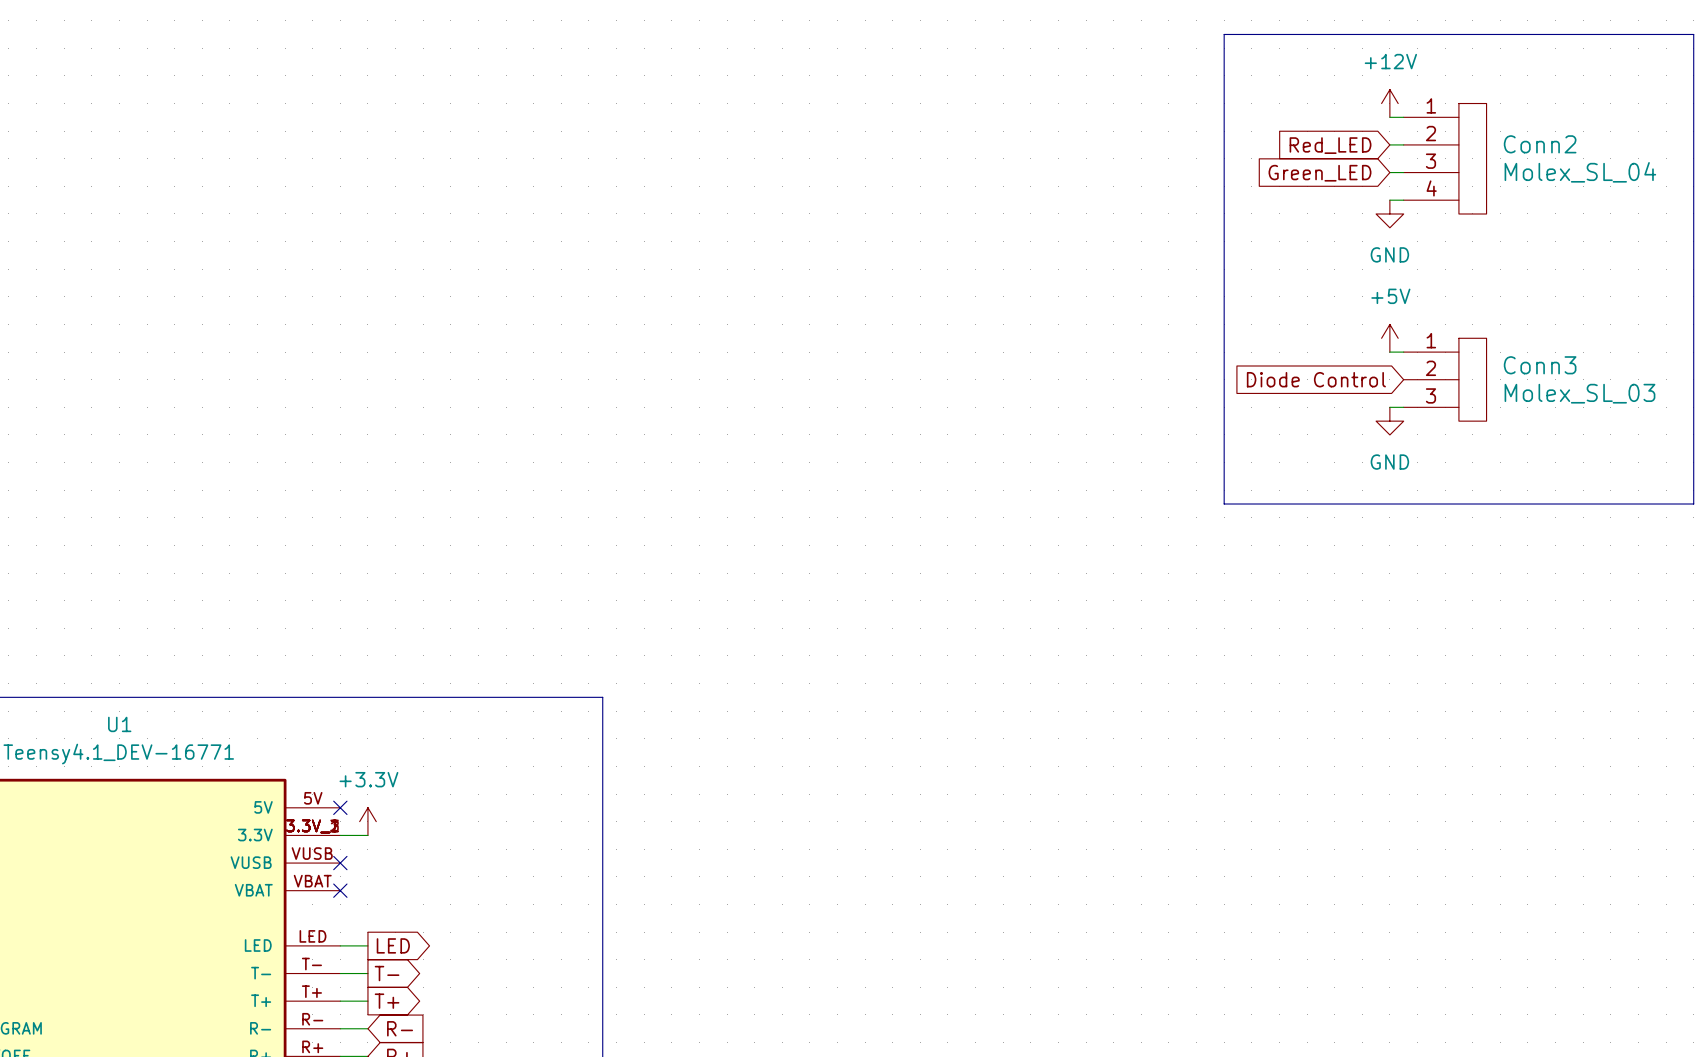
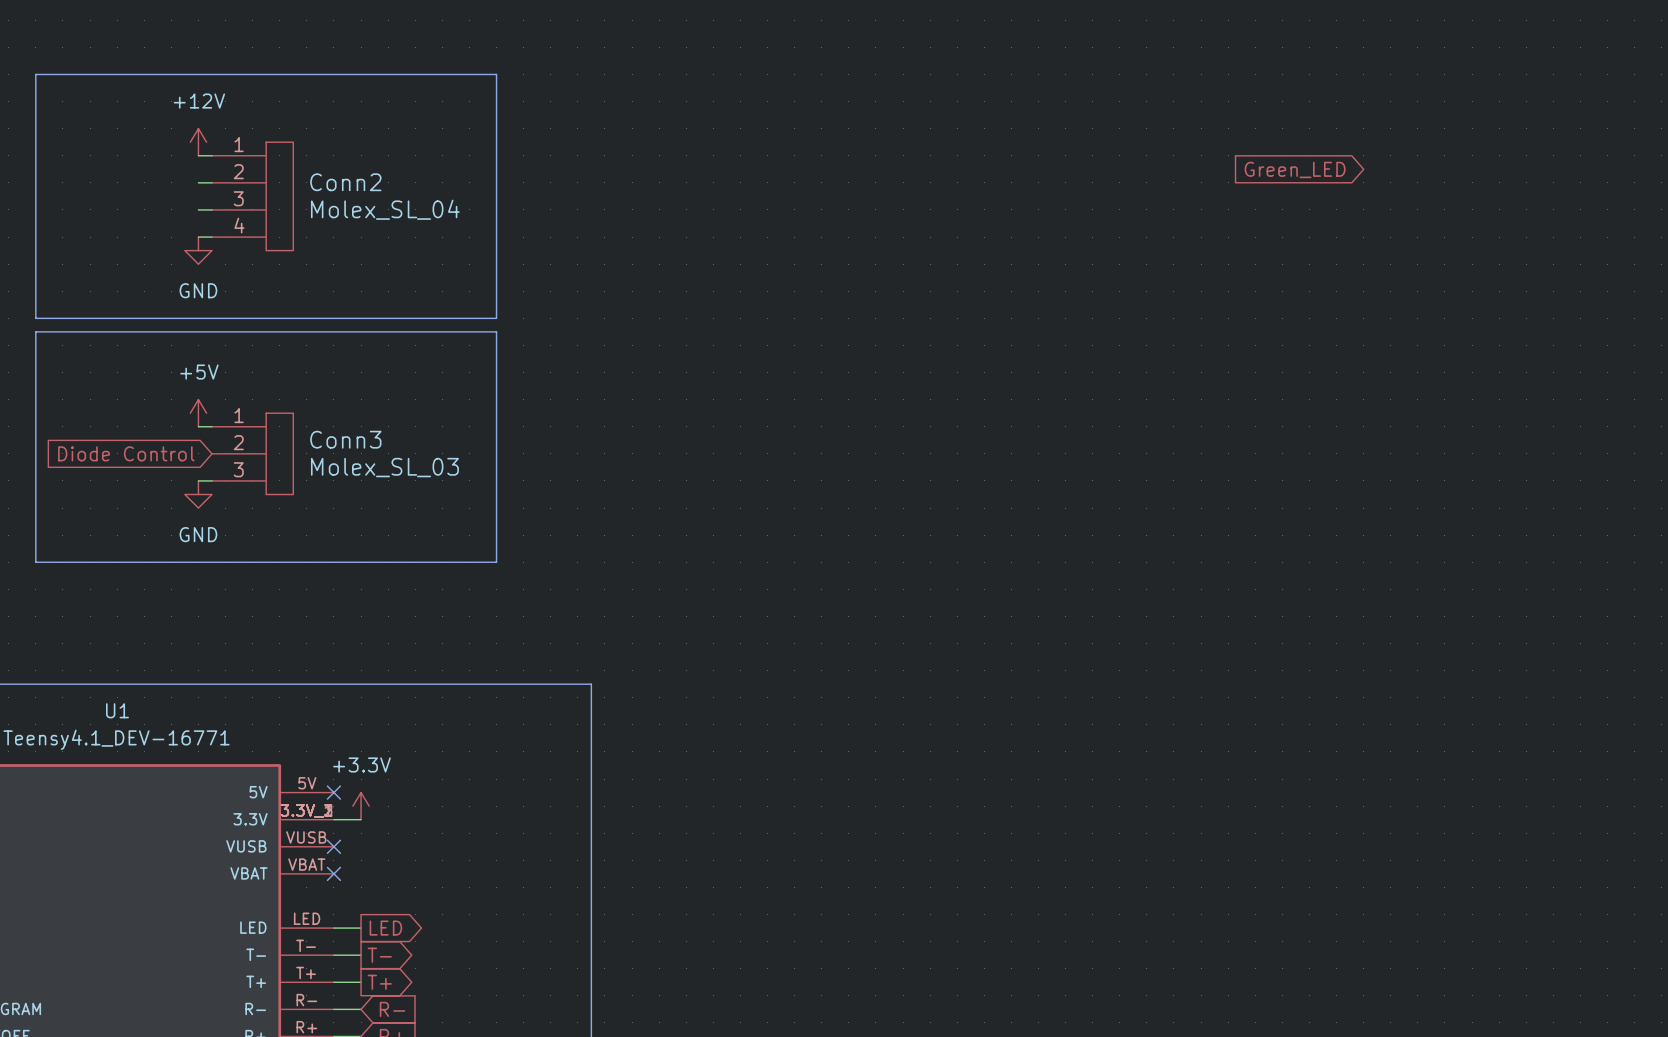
line: (1224, 34) (1693, 34) (1693, 504) (1224, 504) (1224, 34) -> none
line: none -> (35, 74) (496, 74) (496, 318) (35, 318) (35, 74)
power symbol: +12V (1389, 103) -> none
wire: (1389, 117) (1403, 117) -> none
power symbol: none -> +12V (198, 142)
wire: (1389, 144) (1403, 144) -> none
global label: Red_LED (1330, 145) -> none
wire: none -> (198, 155) (211, 155)
Conn2 position: (1445, 158) -> (252, 196)
wire: (1389, 172) (1403, 172) -> none
wire: none -> (198, 182) (211, 182)
wire: (1389, 200) (1403, 200) -> none
wire: none -> (198, 209) (211, 209)
power symbol: GND (1389, 213) -> none
wire: none -> (198, 237) (211, 237)
power symbol: none -> GND (198, 250)
line: none -> (35, 331) (35, 562) (496, 562) (496, 331) (35, 331)
power symbol: +5V (1389, 338) -> none
wire: (1389, 352) (1403, 352) -> none
global label: Diode Control (1316, 379) -> none
Conn3 position: (1445, 379) -> (252, 453)
wire: (1389, 407) (1403, 407) -> none
power symbol: none -> +5V (198, 413)
power symbol: GND (1389, 421) -> none
wire: none -> (198, 426) (211, 426)
global label: none -> Diode Control (126, 453)
wire: none -> (198, 480) (211, 480)
power symbol: none -> GND (198, 494)

